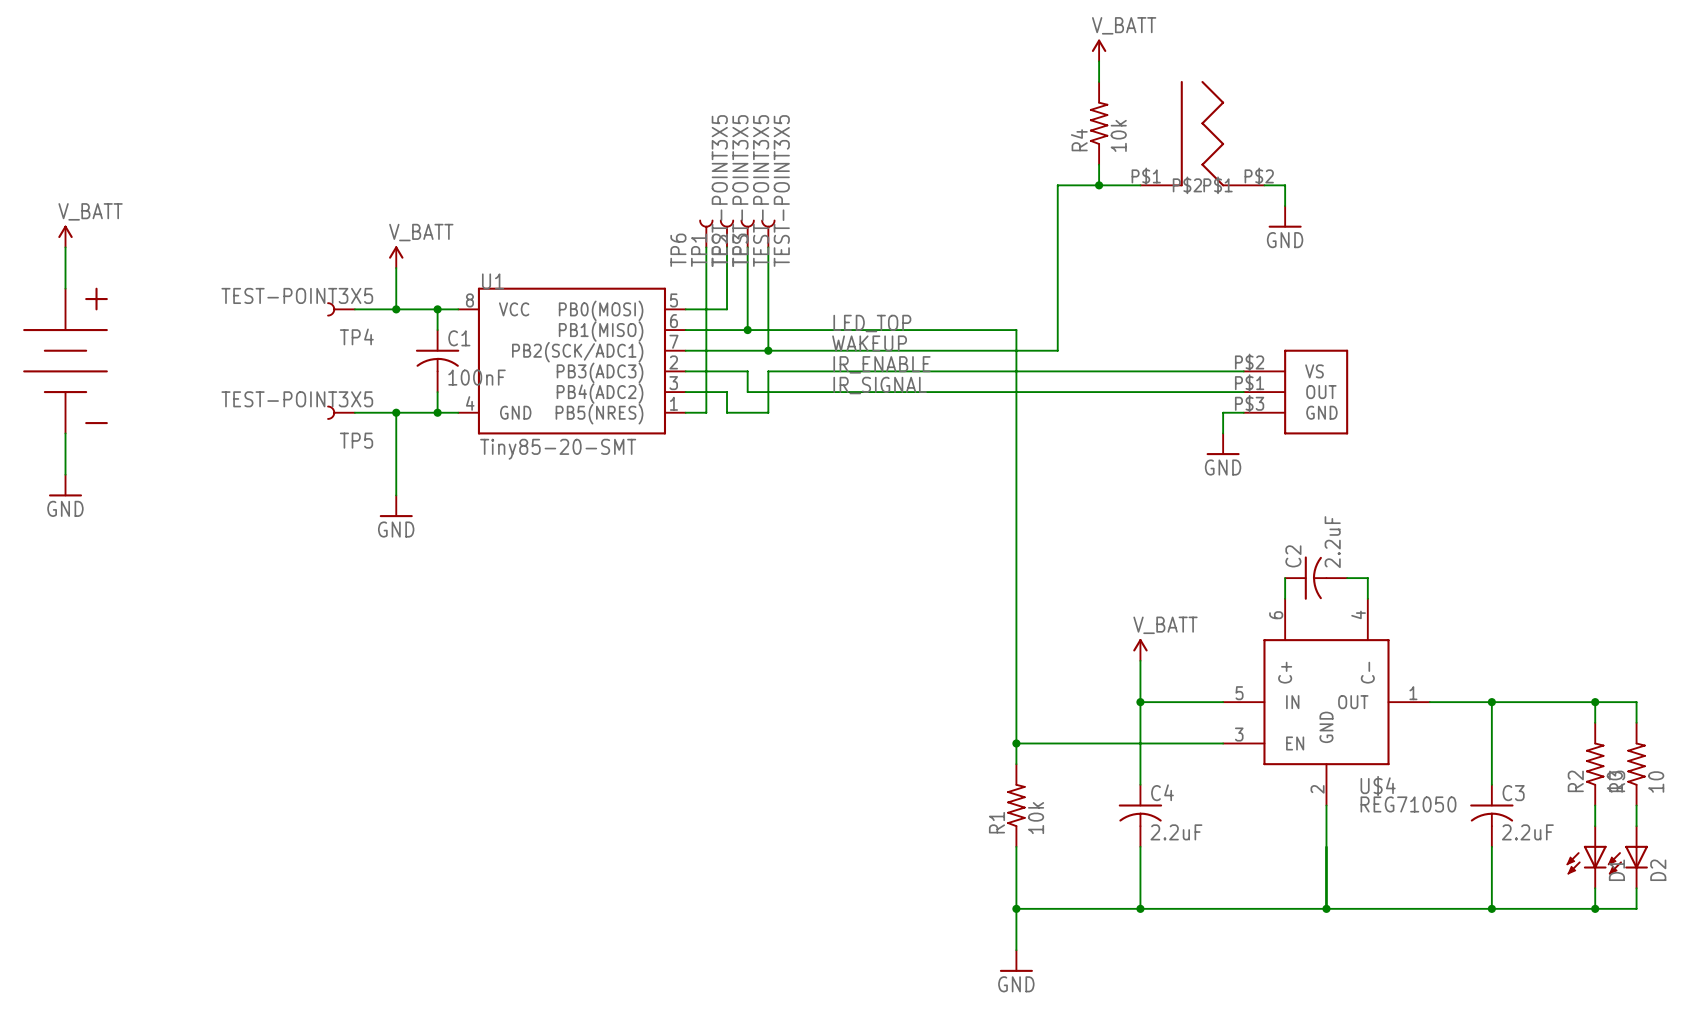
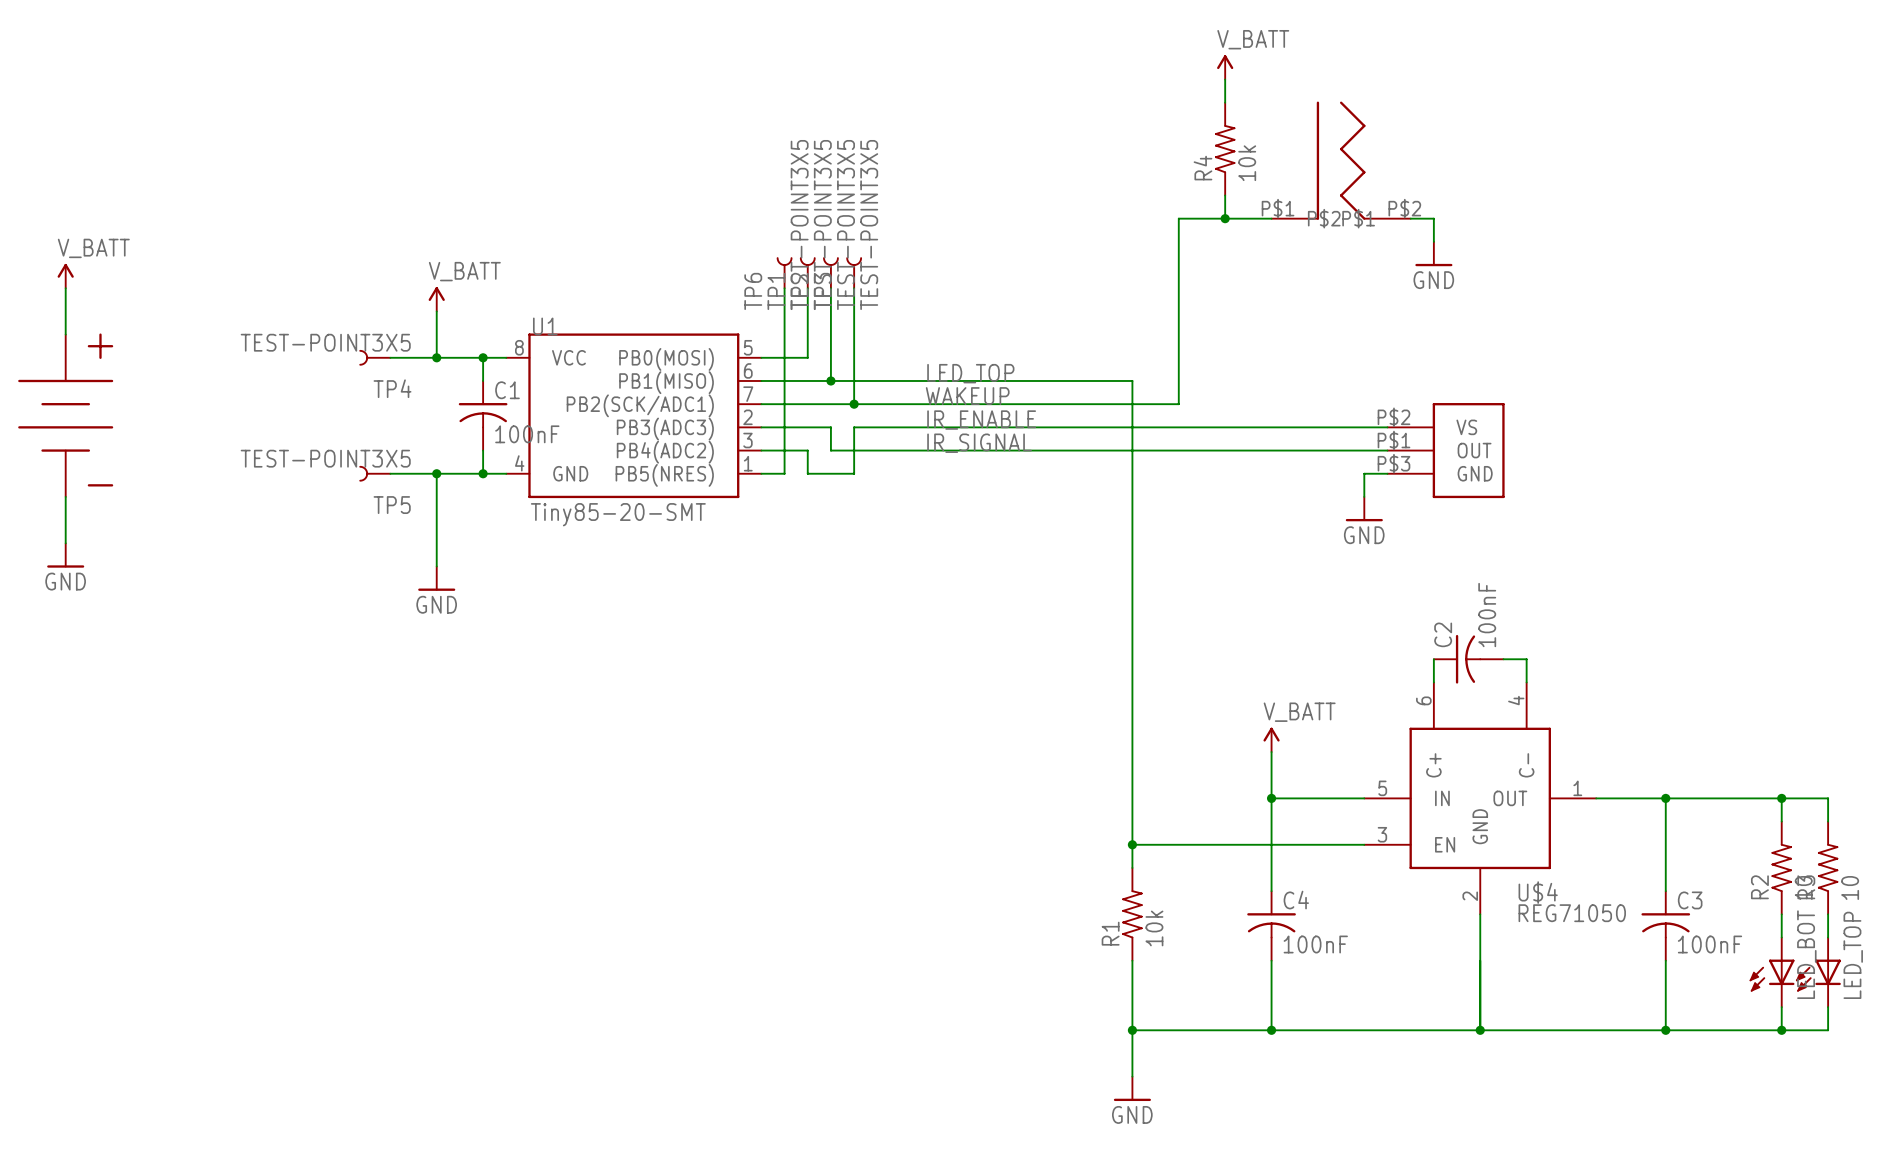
C2 value: 2.2uF (1332, 542) -> 100nF (1487, 615)
C4 value: 2.2uF (1176, 832) -> 100nF (1315, 944)
C3 value: 2.2uF (1527, 832) -> 100nF (1709, 944)
D1 name: D1 (1616, 870) -> LED_BOT (1806, 954)
D2 name: D2 (1658, 870) -> LED_TOP (1853, 955)

